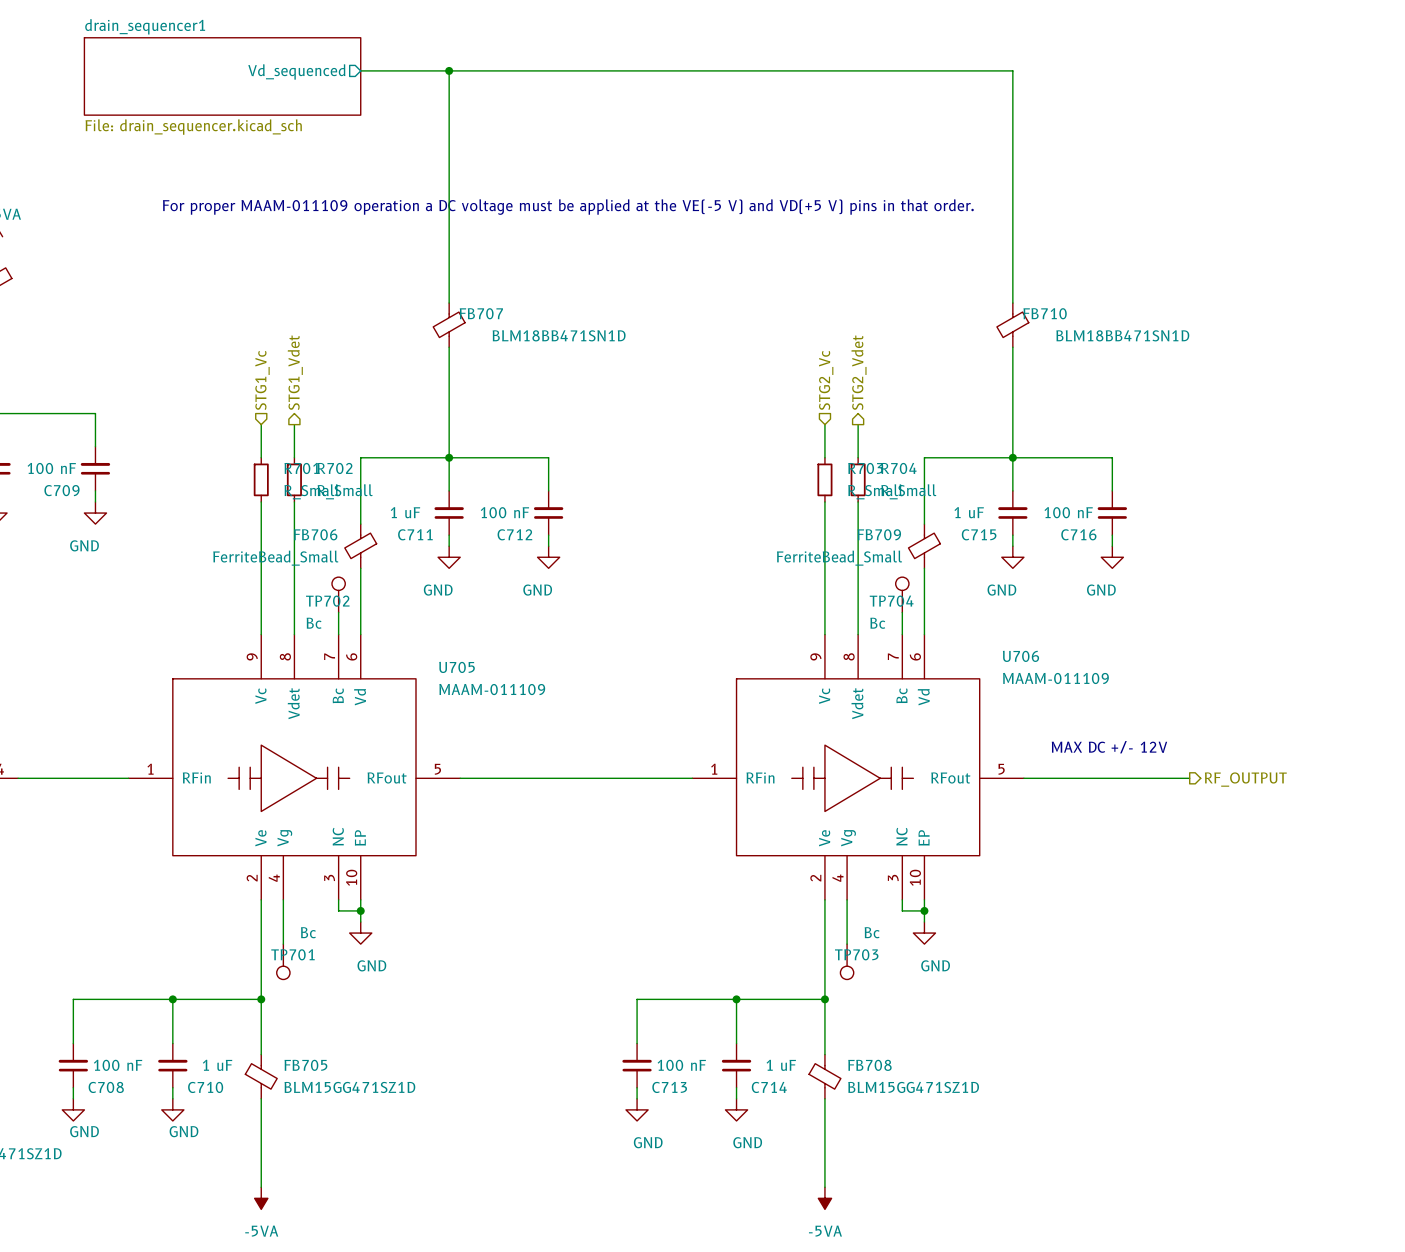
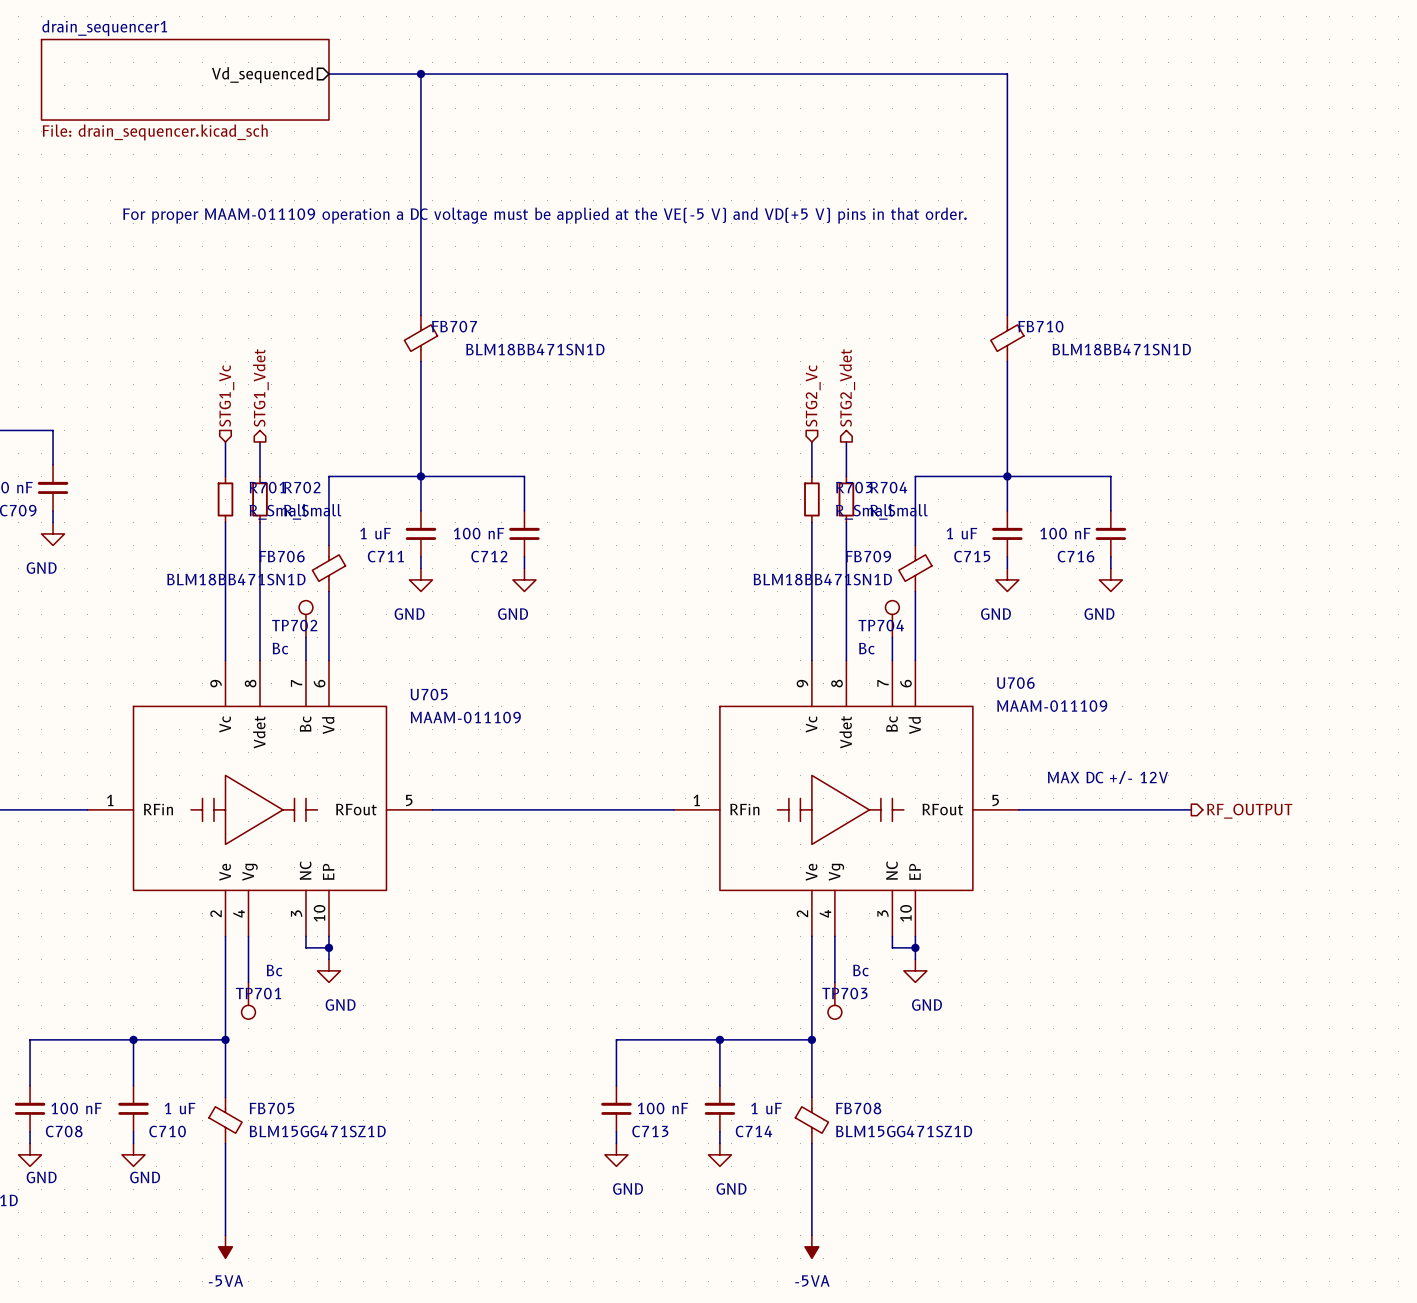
FB706 value: FerriteBead_Small (275, 558) -> BLM18BB471SN1D (236, 579)
FB709 value: FerriteBead_Small (839, 558) -> BLM18BB471SN1D (822, 579)

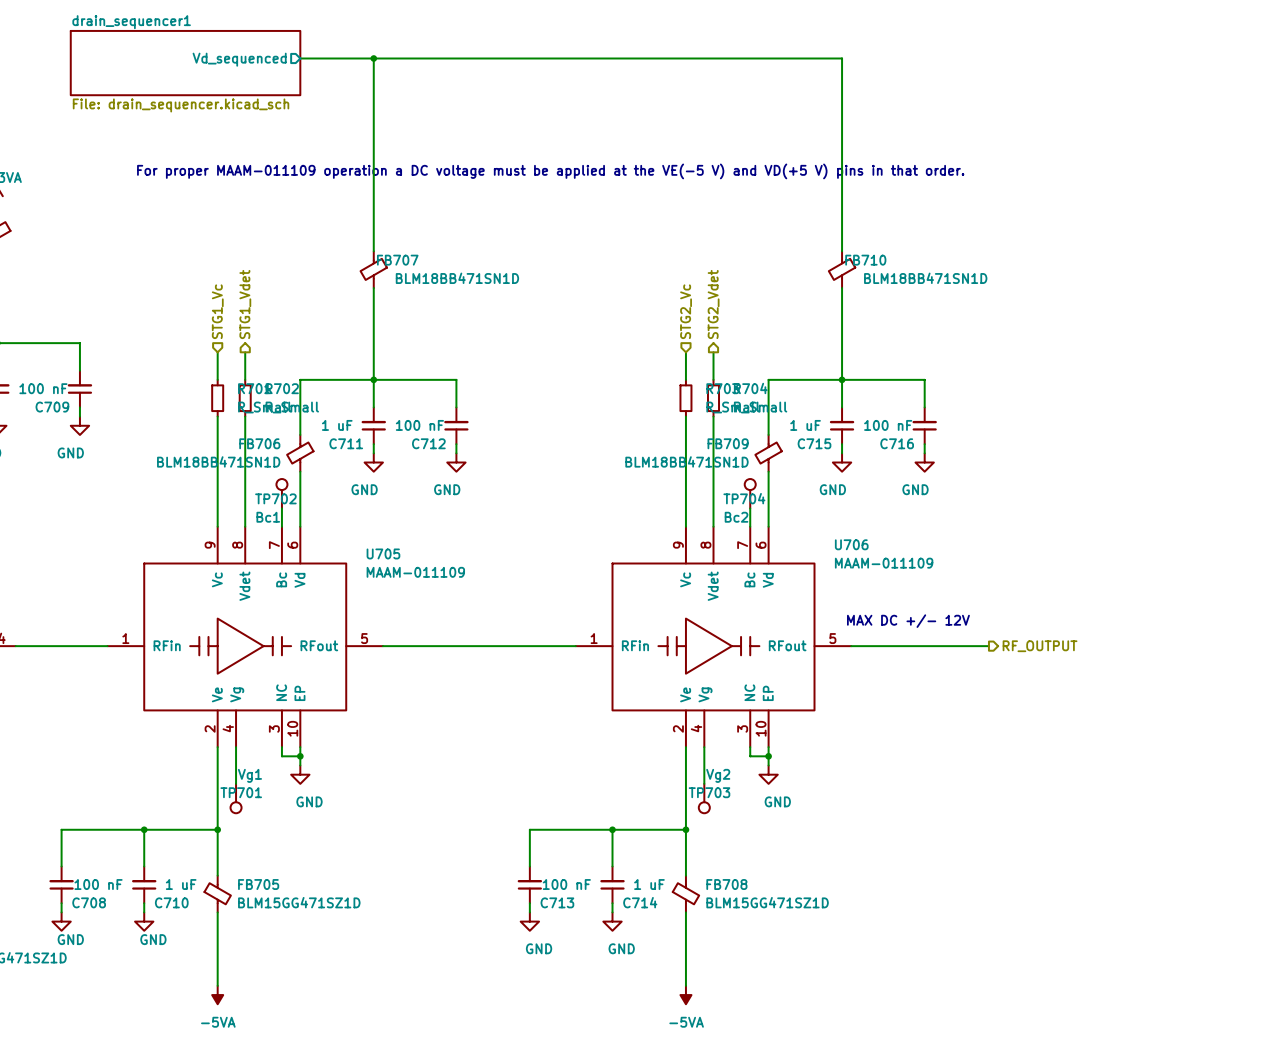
TP702 value: Bc (280, 648) -> Bc1 (268, 517)
TP704 value: Bc (866, 648) -> Bc2 (736, 517)
TP701 value: Bc (274, 970) -> Vg1 (249, 775)
TP703 value: Bc (860, 970) -> Vg2 (718, 775)

